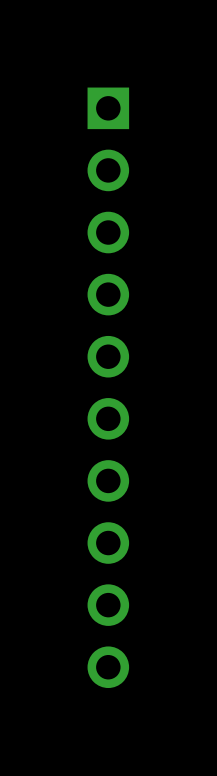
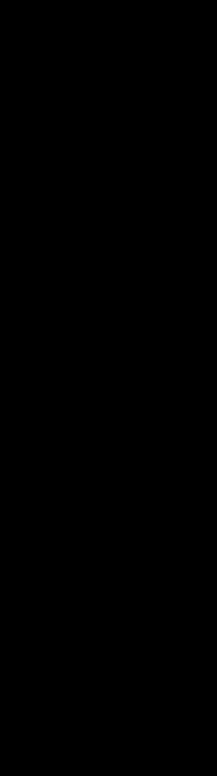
part: (108, 387) -> none

